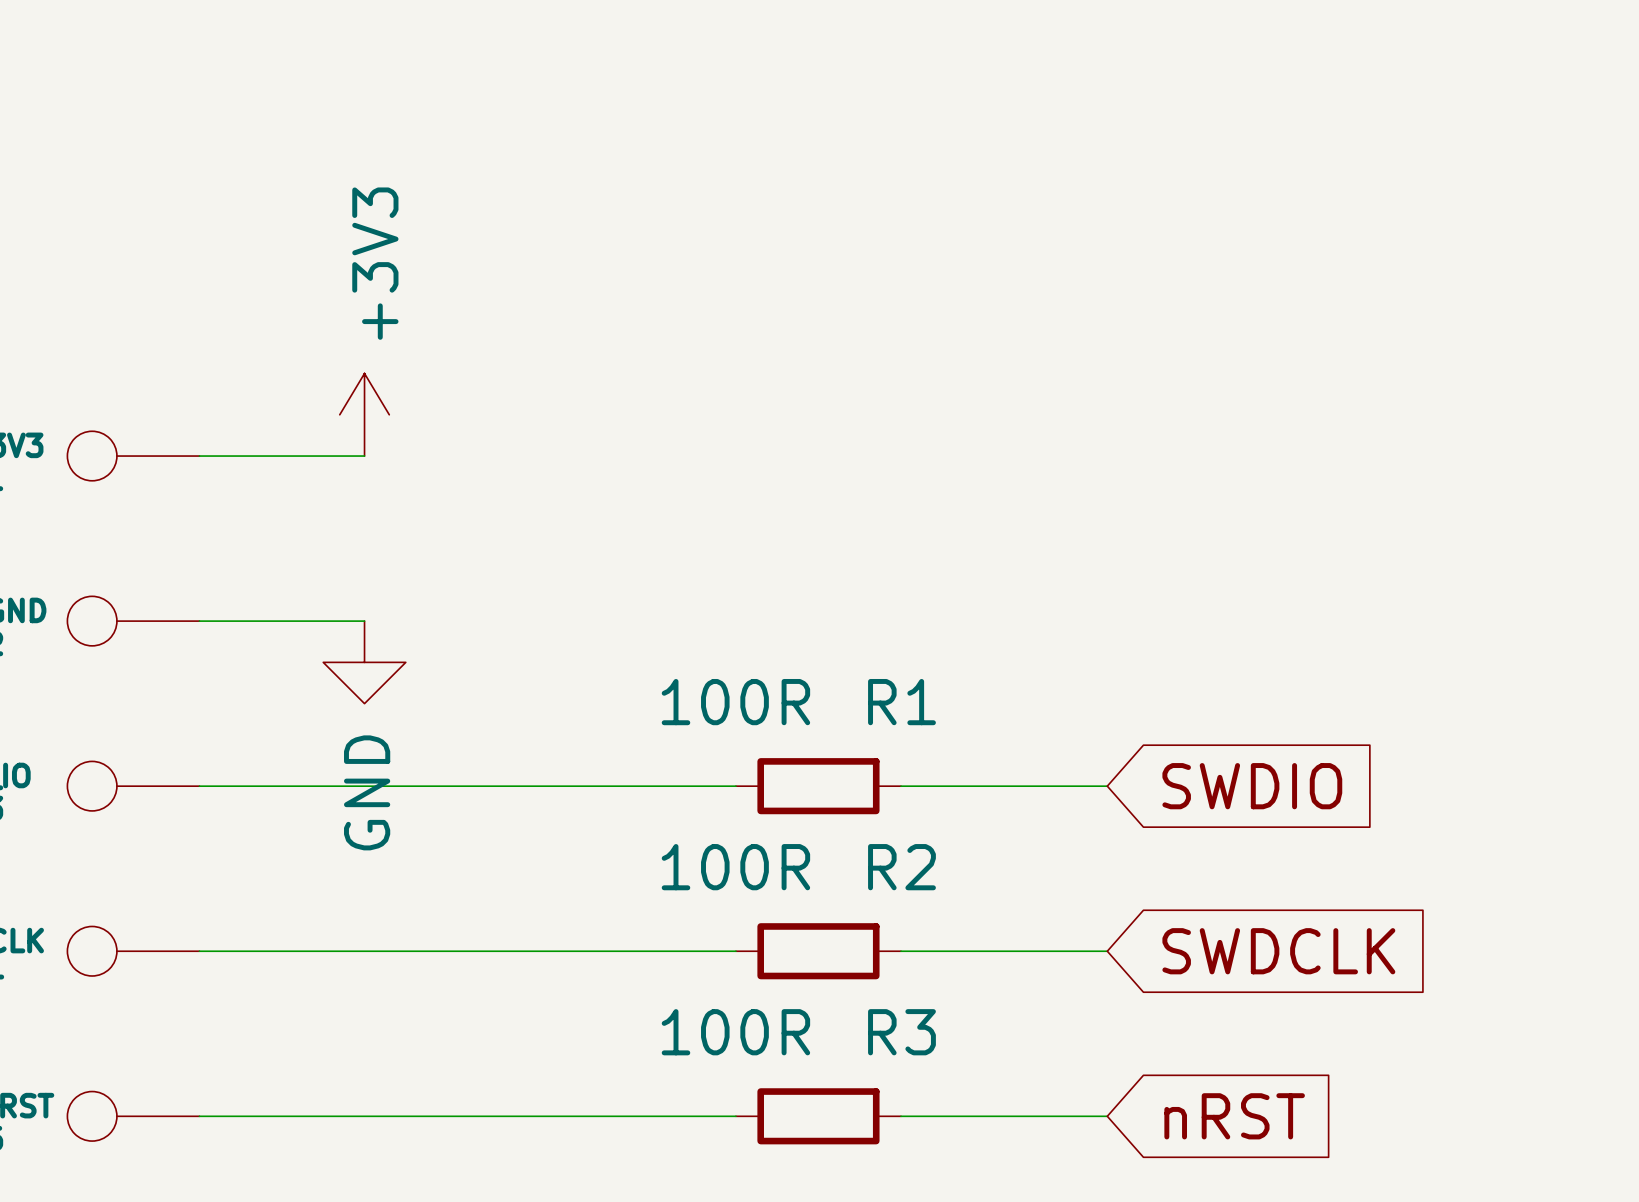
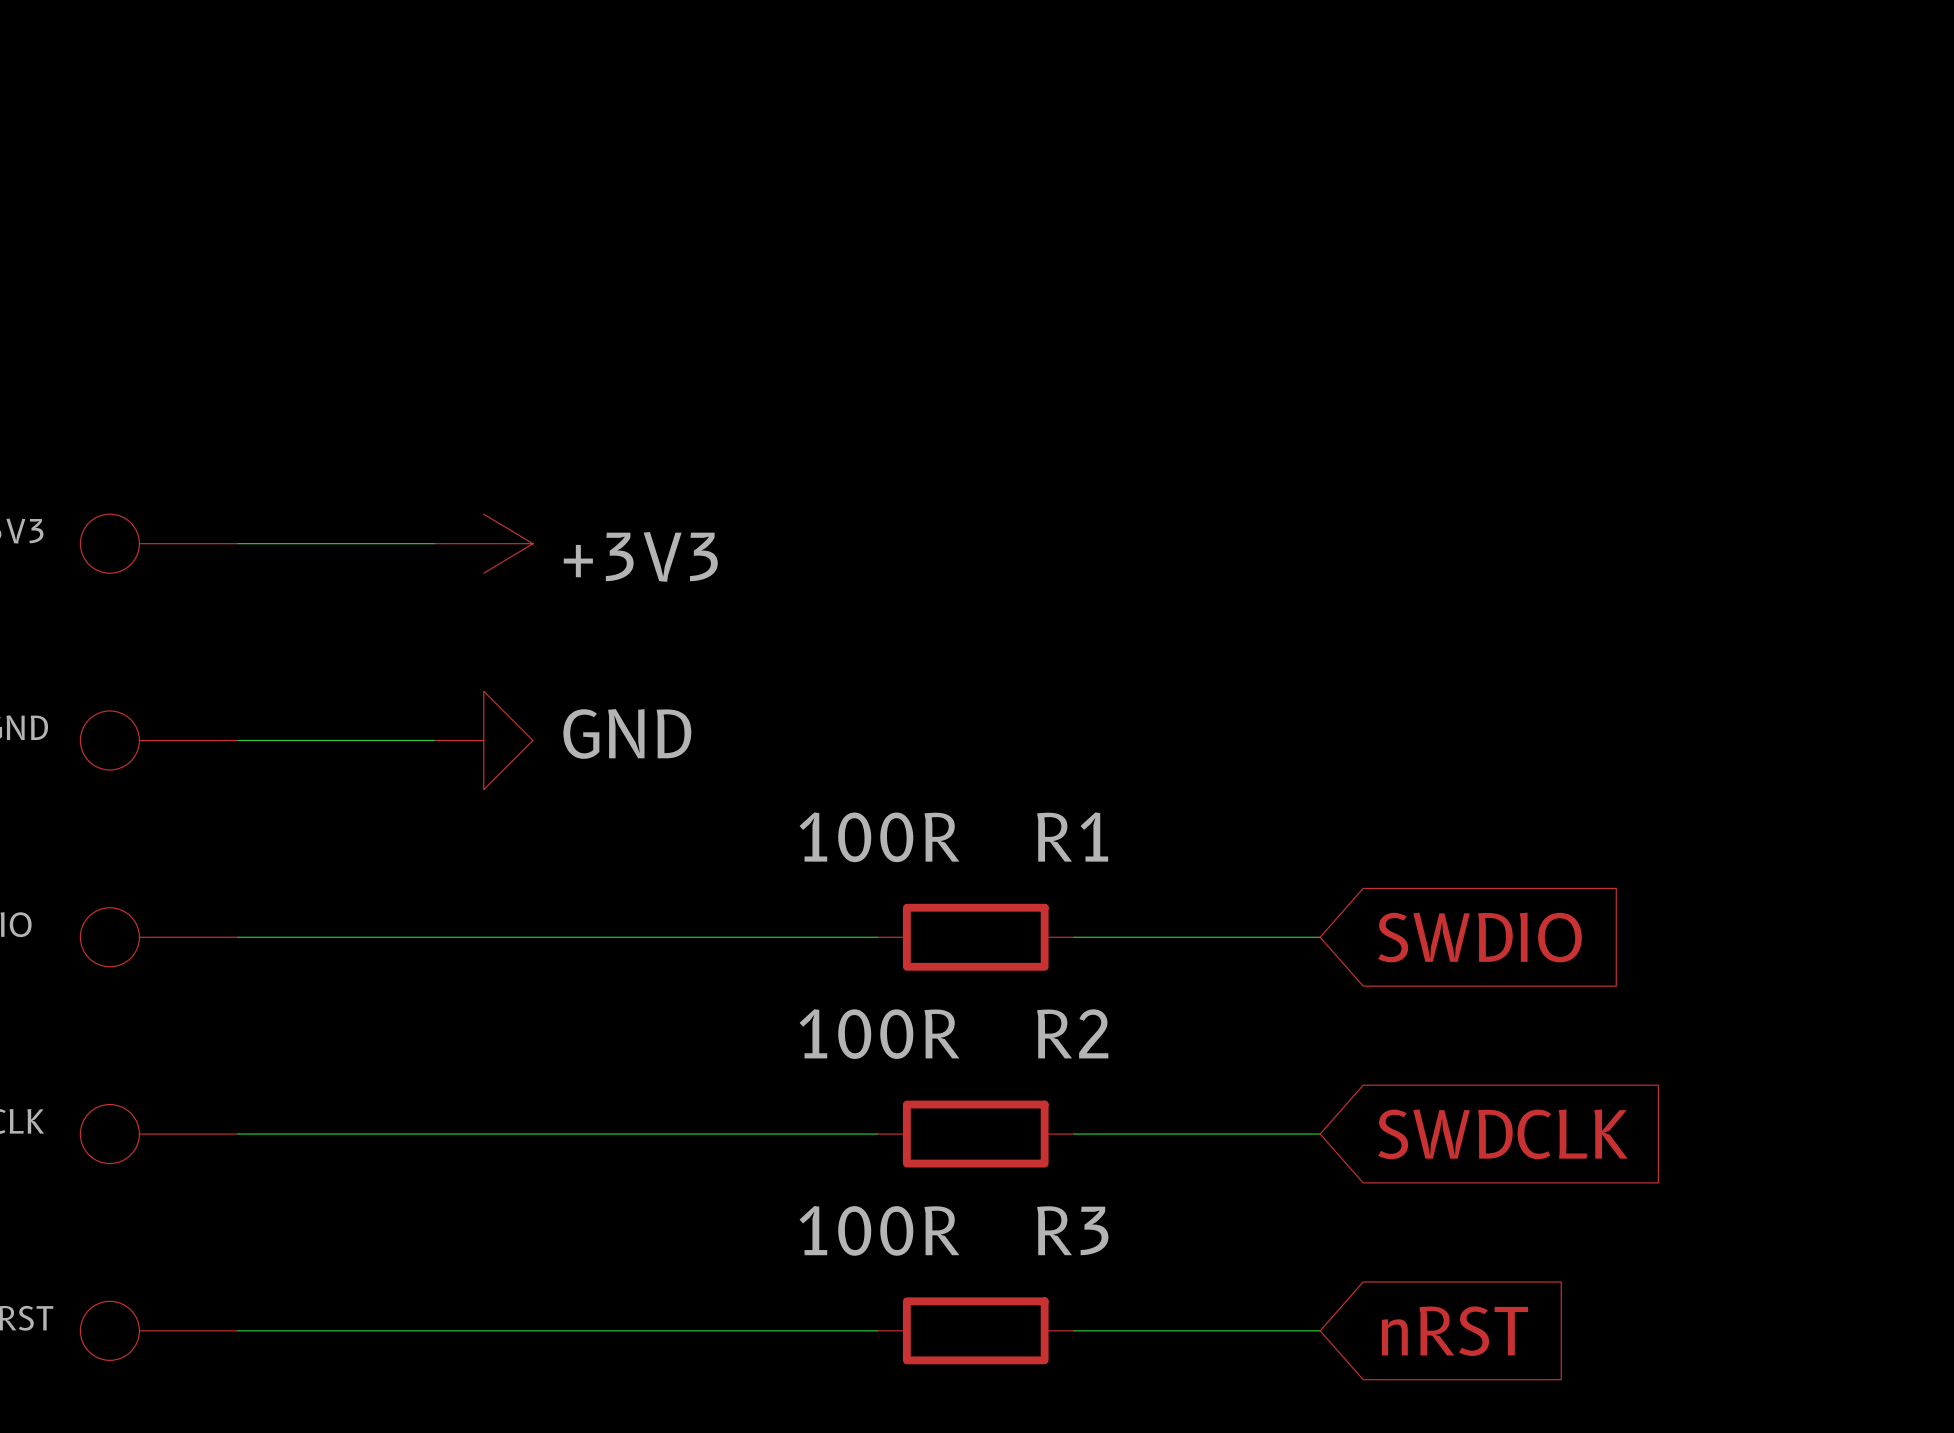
power symbol rotation: 0° (364, 414) -> 90° clockwise (483, 543)
power symbol position: +3V3 (364, 414) -> +3V3 (483, 543)
power symbol rotation: 0° (364, 662) -> 90° counterclockwise (483, 740)
power symbol position: GND (364, 662) -> GND (483, 740)

